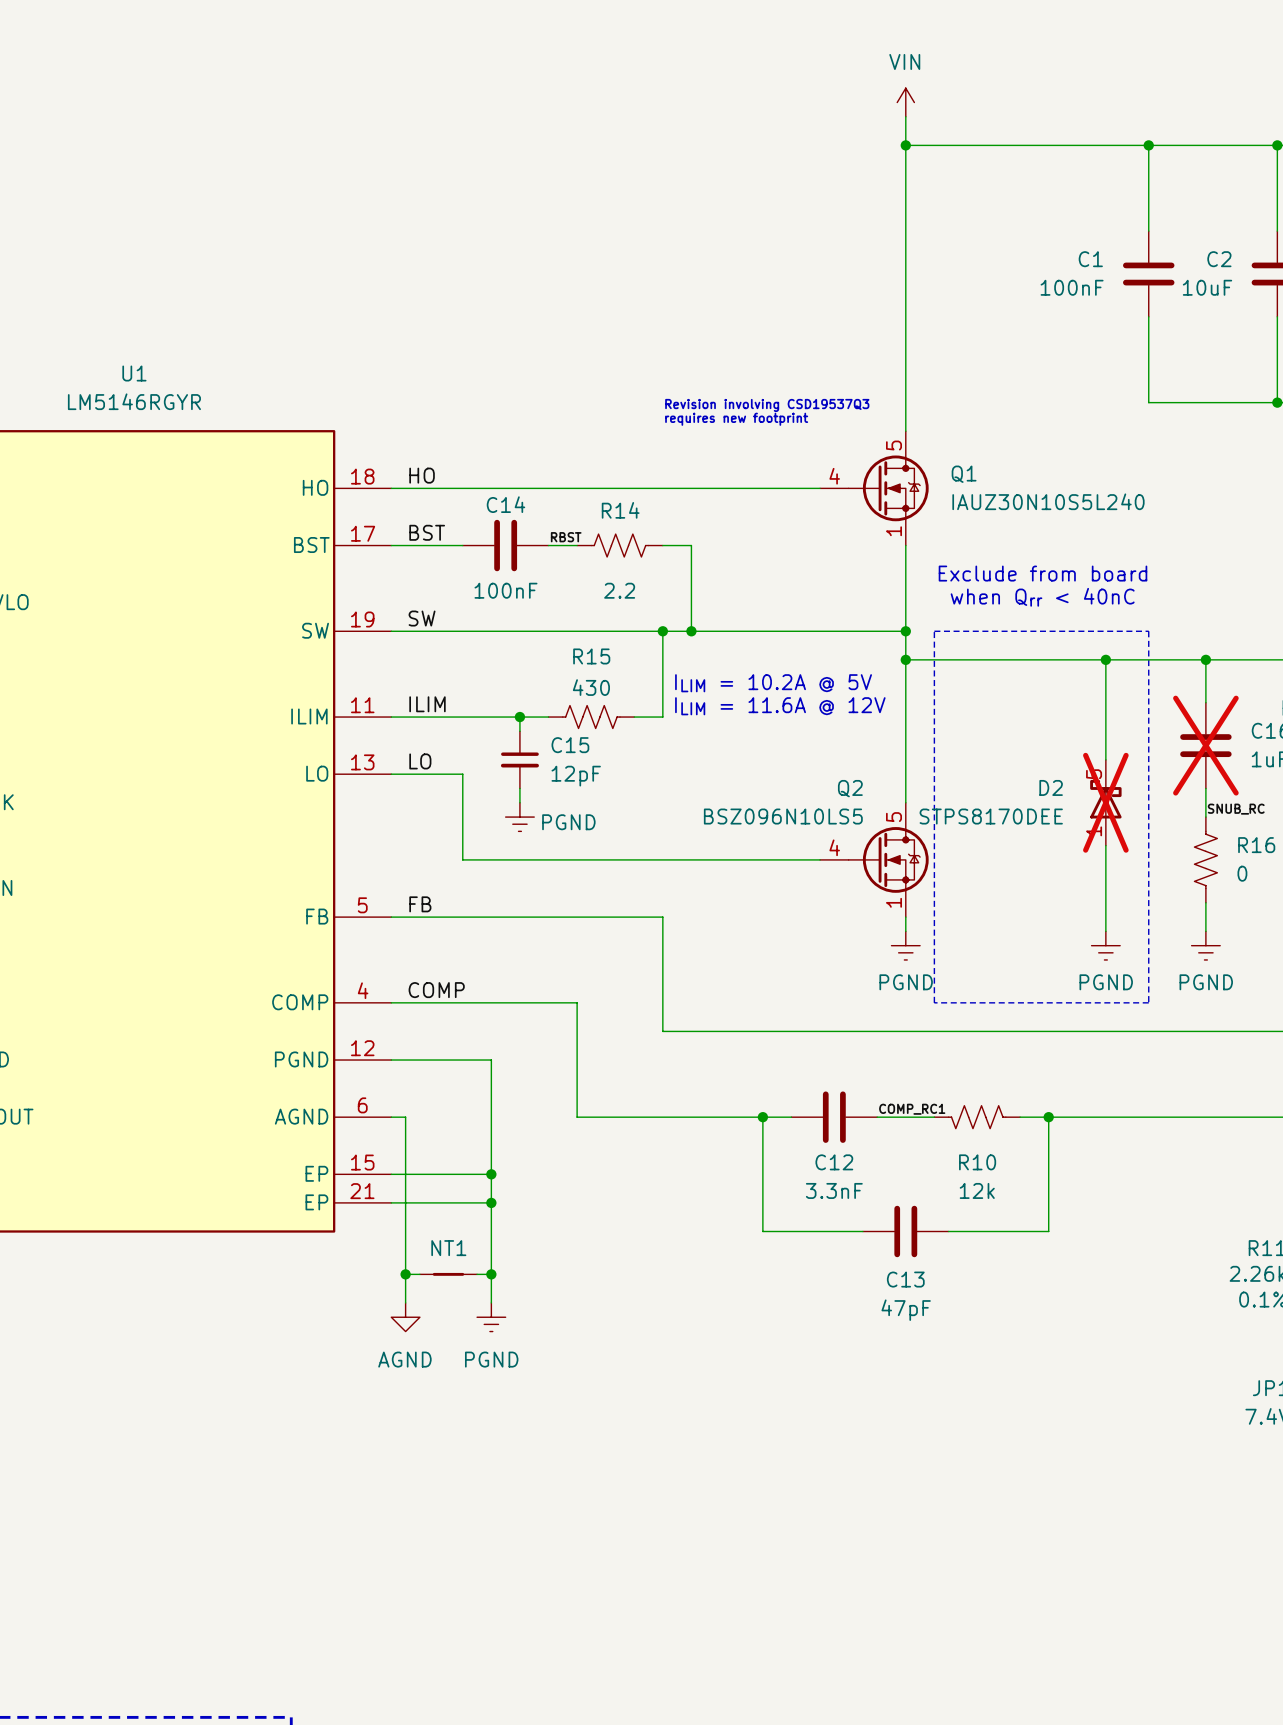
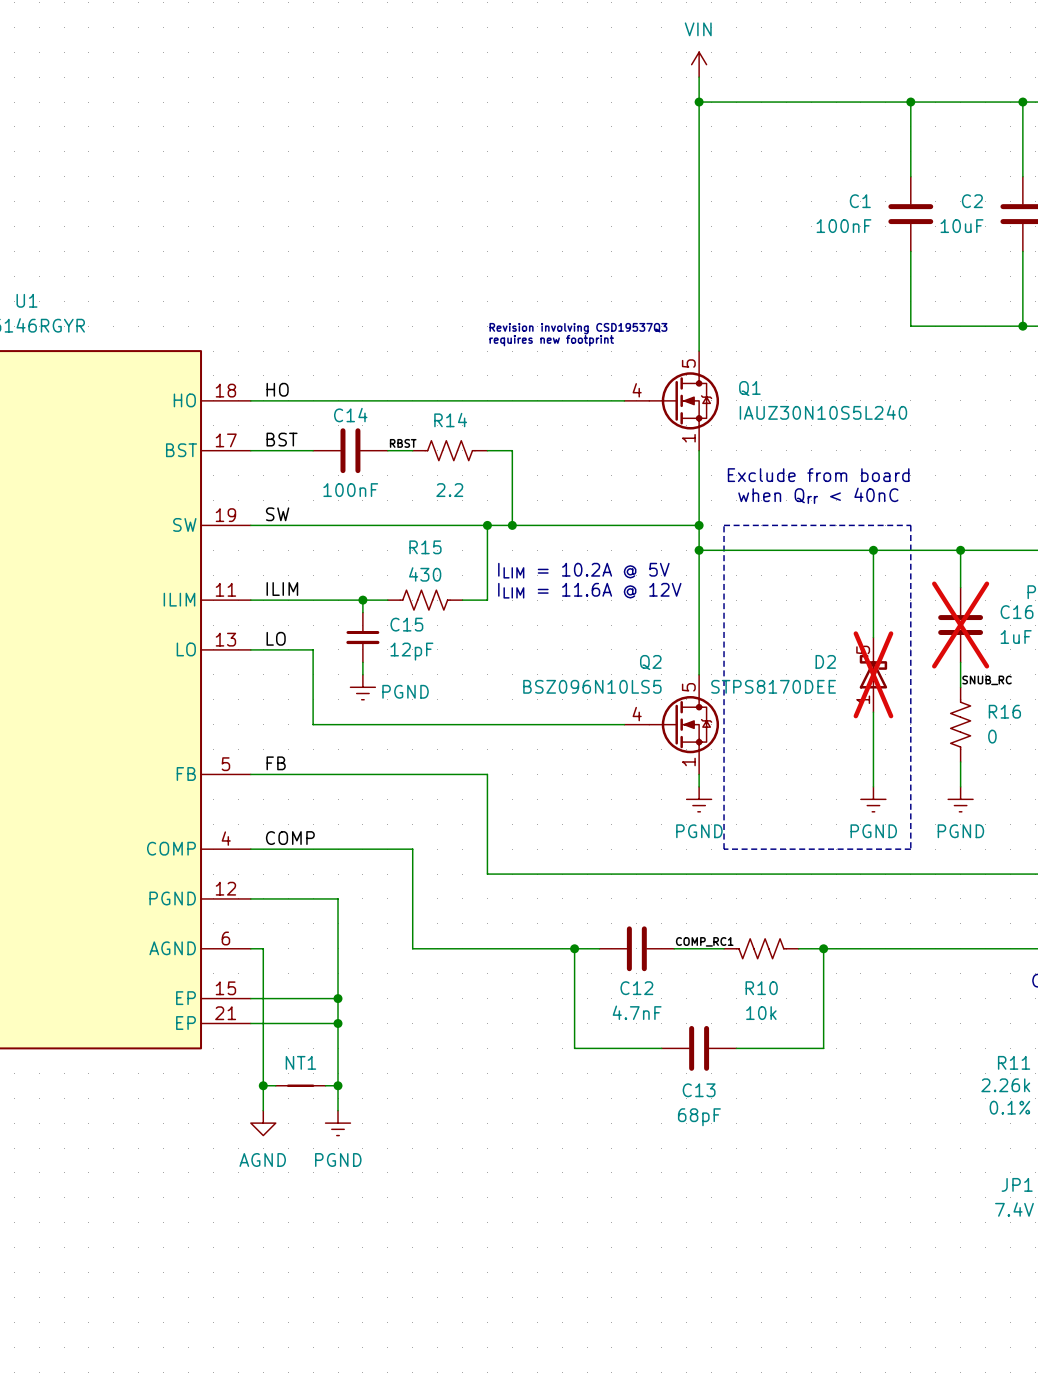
C12 value: 3.3nF (834, 1190) -> 4.7nF (637, 1012)
R10 value: 12k (977, 1190) -> 10k (761, 1013)
C13 value: 47pF (906, 1310) -> 68pF (699, 1117)

